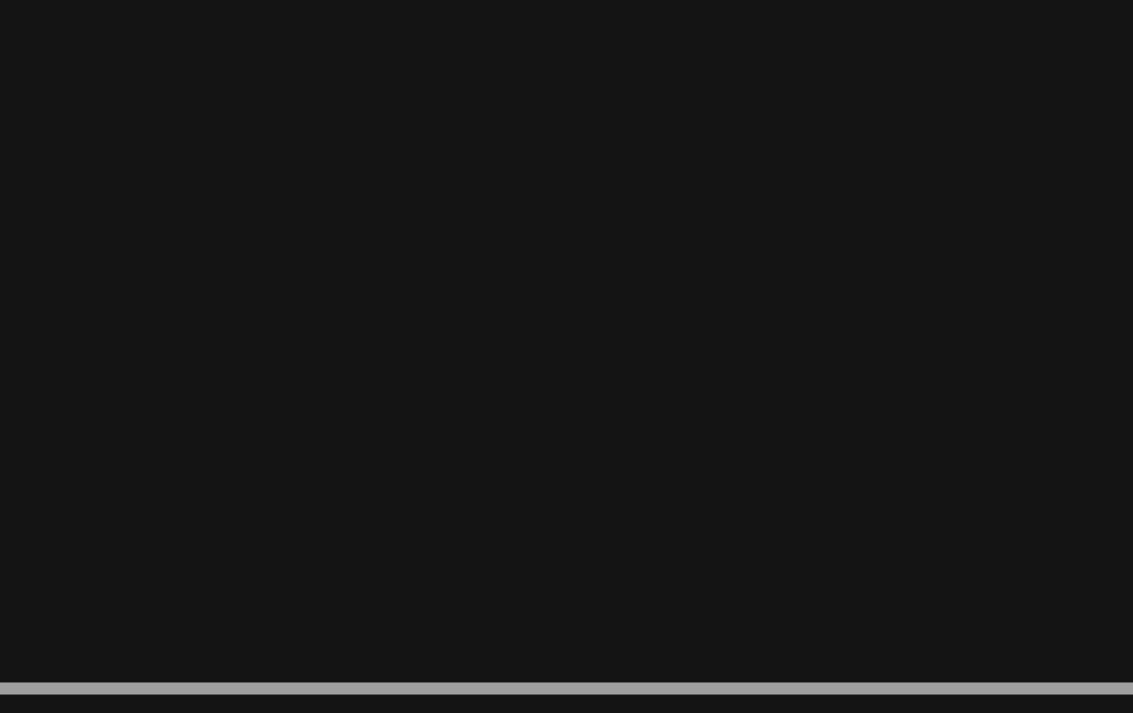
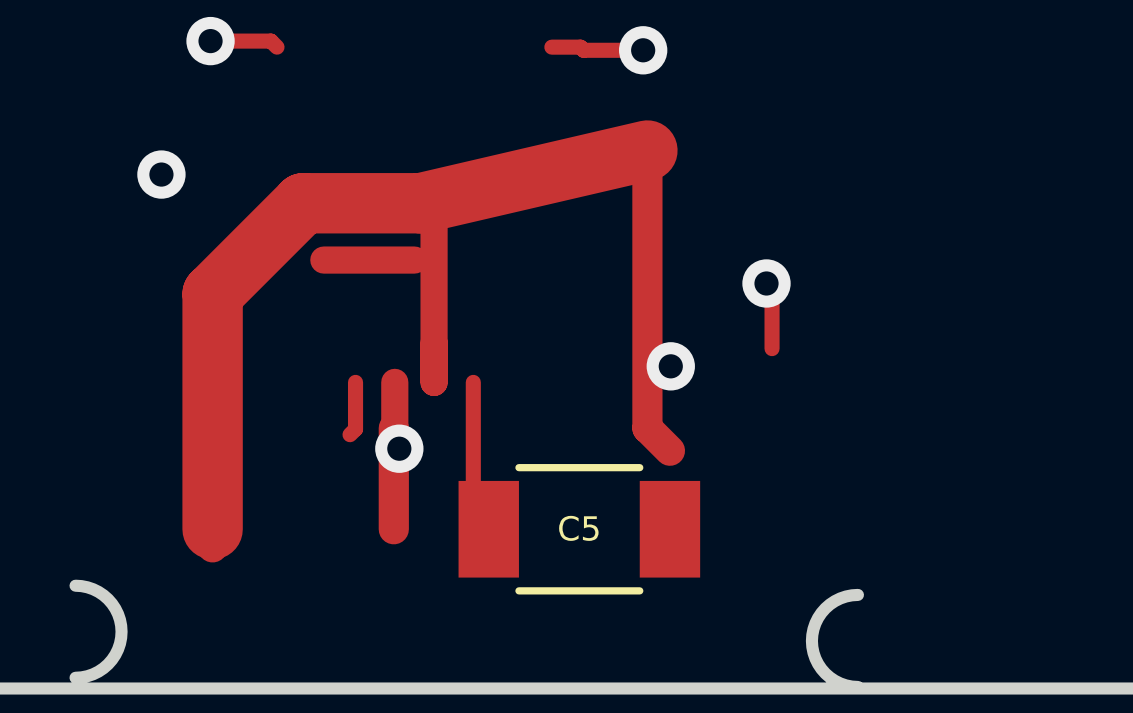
track: none -> (210, 41) (270, 41) (277, 47)
via: none -> (210, 41)
track: none -> (551, 47) (580, 47) (583, 50) (643, 50)
via: none -> (643, 50)
via: none -> (161, 174)
track: none -> (420, 203) (434, 216) (434, 382)
track: none -> (420, 203) (303, 203) (212, 293) (212, 547)
track: none -> (420, 203) (647, 150) (647, 428) (669, 450)
track: none -> (323, 260) (414, 260)
track: none -> (766, 283) (772, 289) (772, 348)
via: none -> (766, 283)
via: none -> (670, 366)
track: none -> (355, 382) (355, 429) (350, 434)
track: none -> (473, 382) (473, 513) (488, 529)
track: none -> (399, 448) (394, 444) (394, 382) (393, 529)
via: none -> (399, 448)
C5: none -> (579, 529)
board edge: none -> (75, 585) (93, 589) (108, 599) (118, 614) (121, 631) (118, 649) (108, 664) (93, 674) (75, 677)
board edge: none -> (857, 594) (840, 598) (825, 608) (815, 623) (811, 640) (815, 658) (825, 673) (840, 683) (857, 686)

